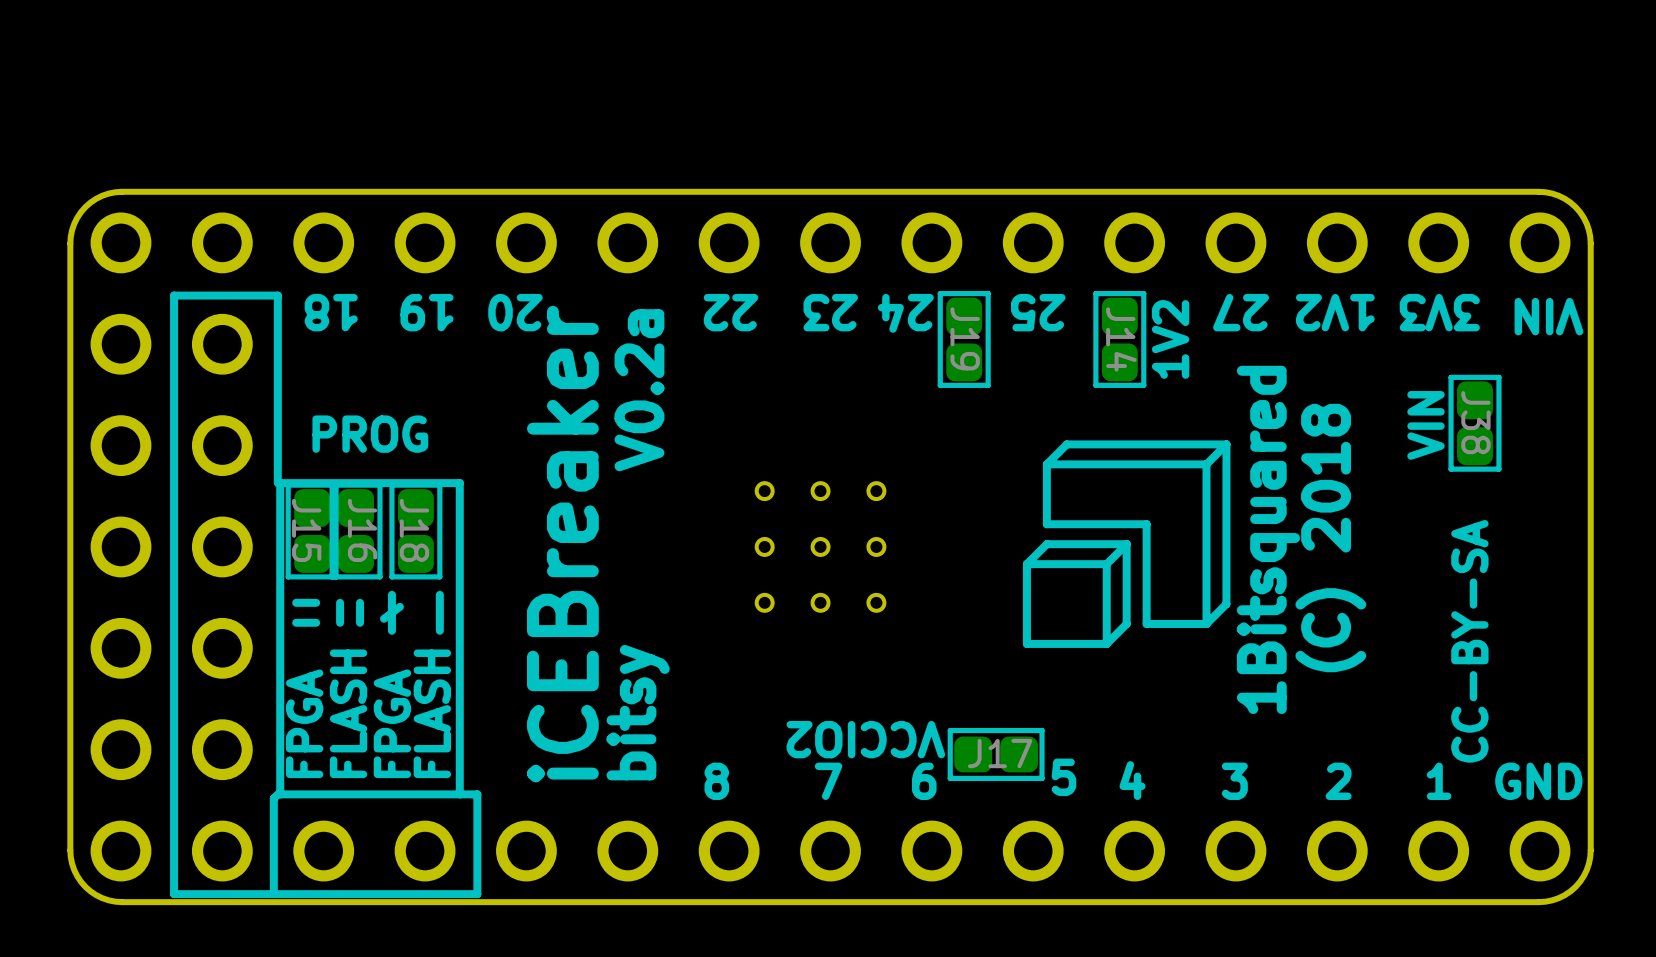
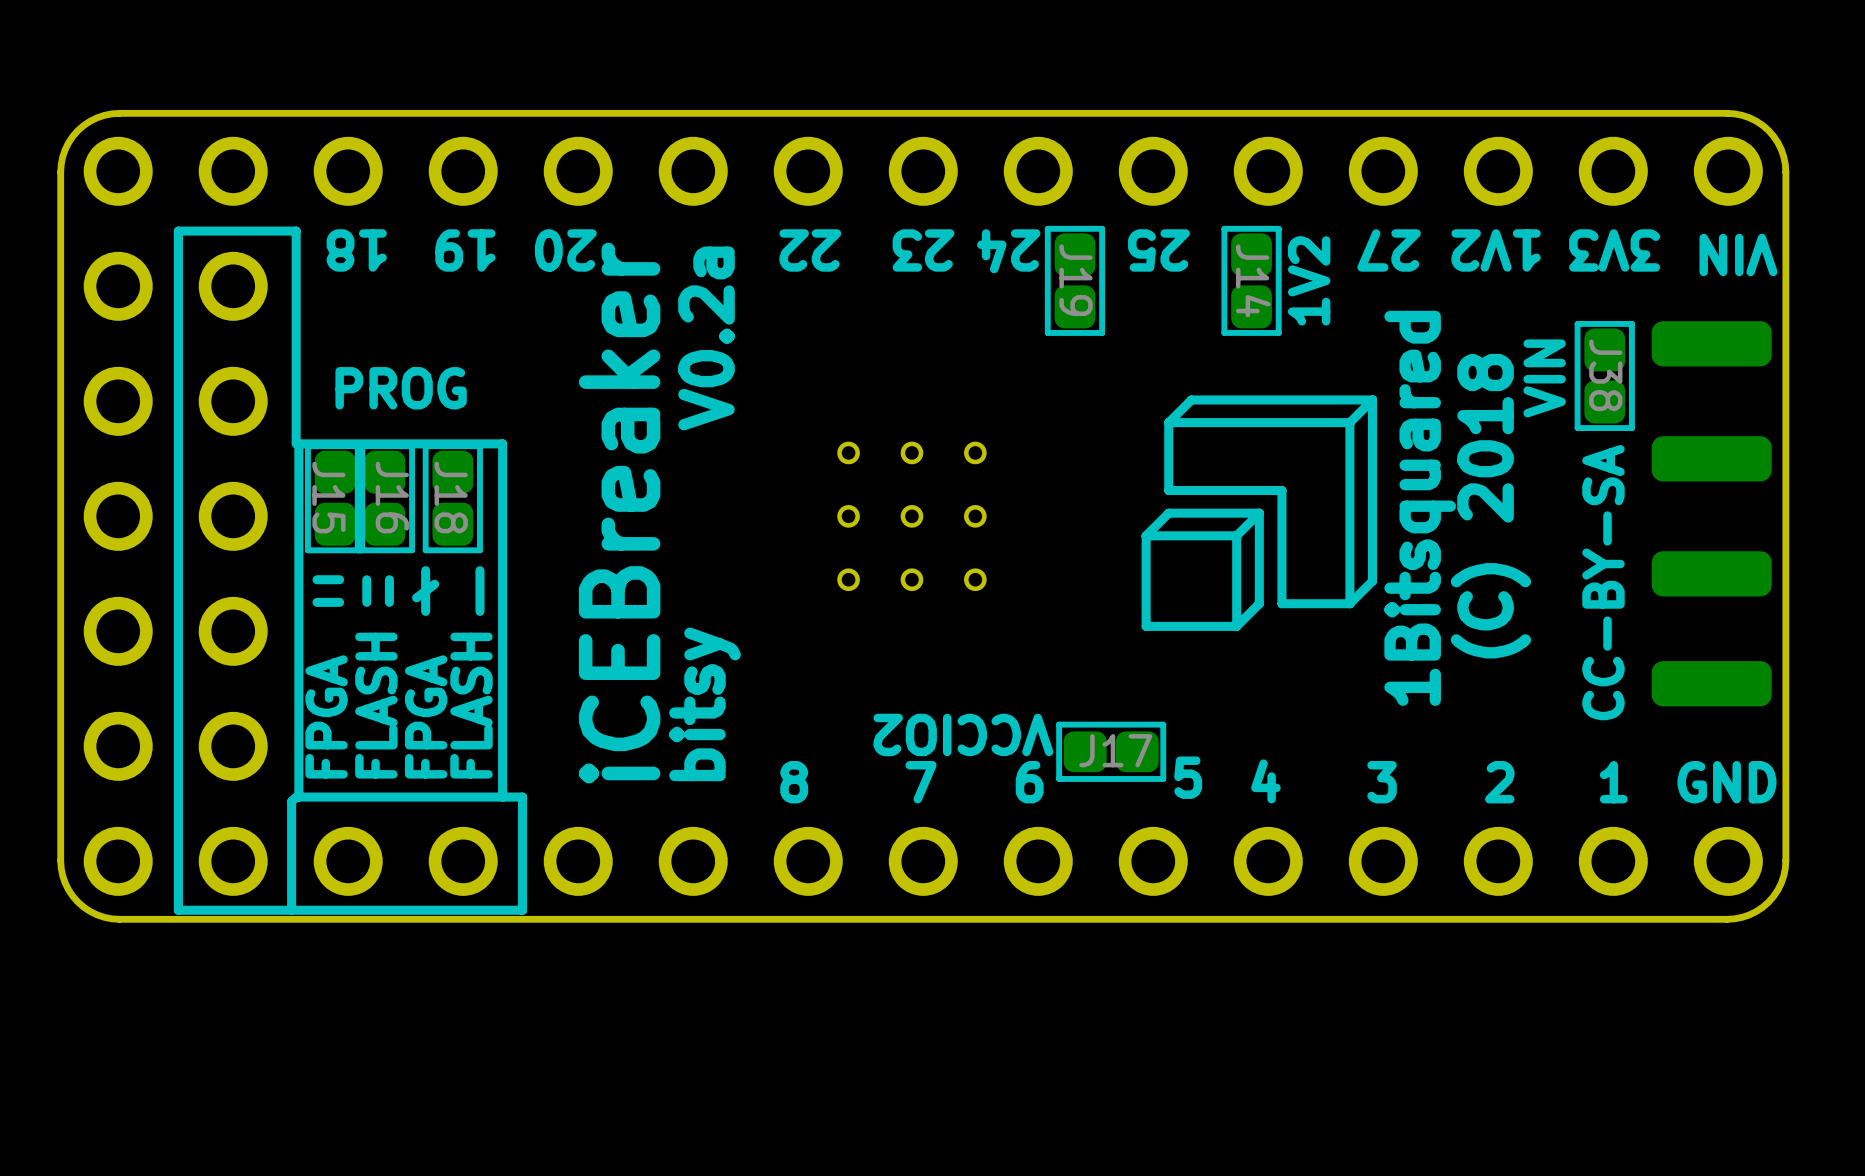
part: none -> (1711, 343)
J38 position: (1475, 423) -> (1604, 375)
text position: VIN (1425, 425) -> VIN (1544, 378)
part: none -> (1711, 458)
part: none -> (1711, 573)
text position: CC-BY-SA (1469, 641) -> CC-BY-SA (1603, 582)
part: none -> (1711, 683)

